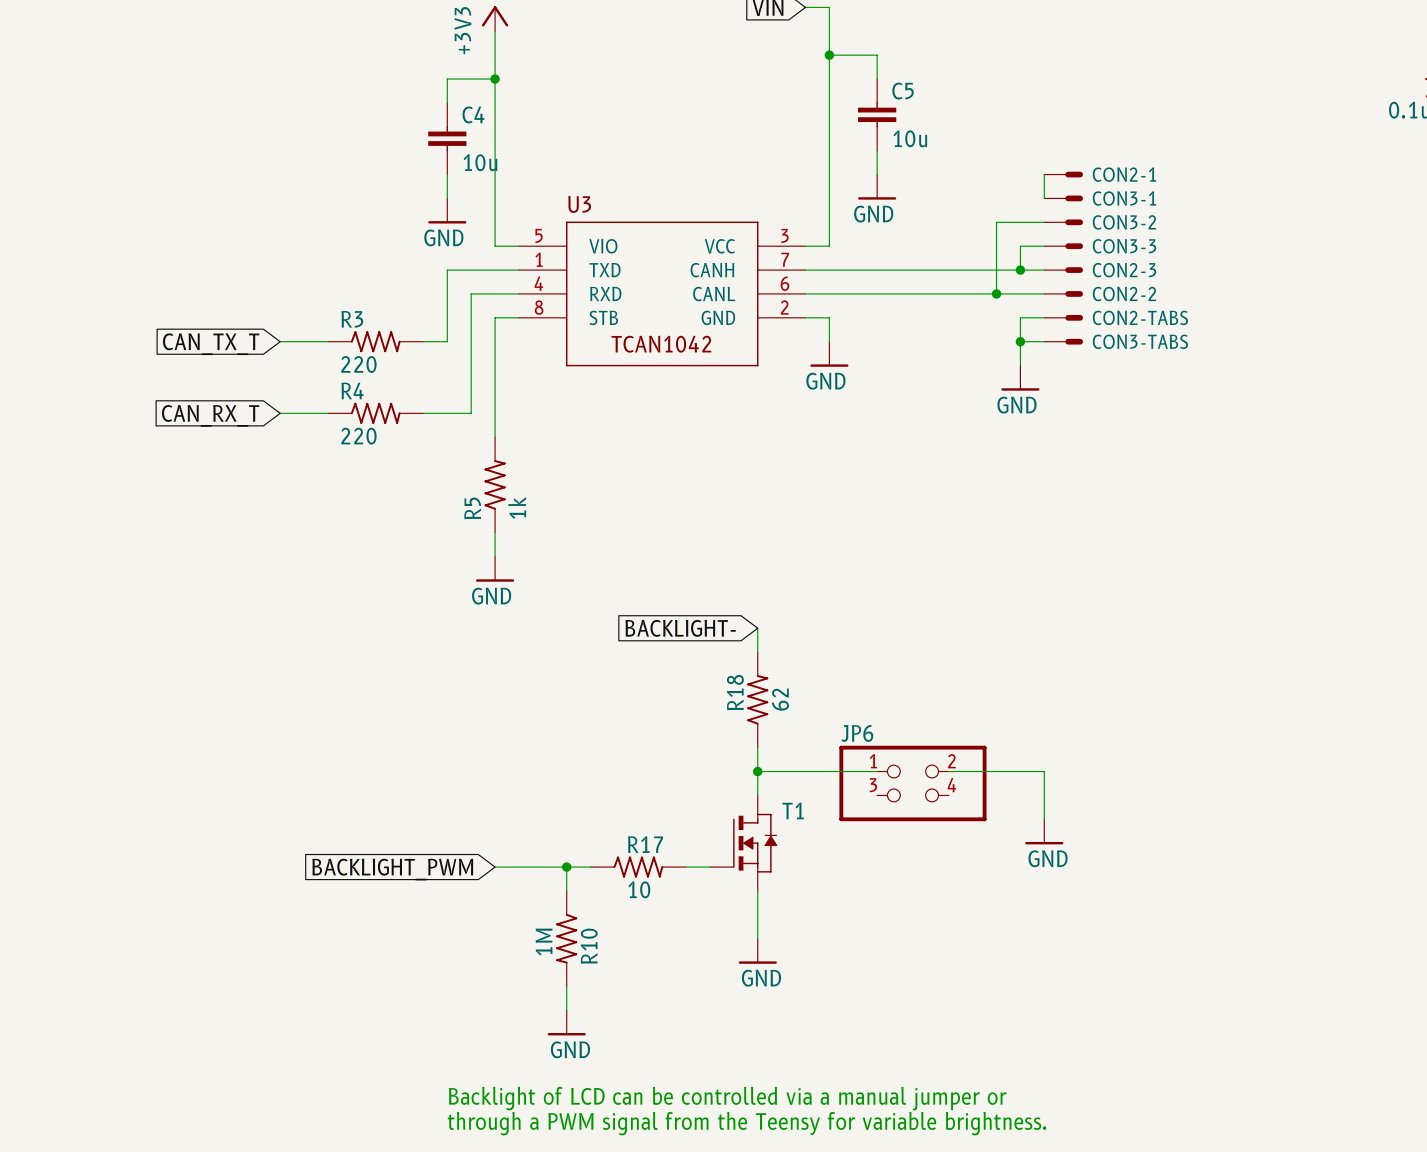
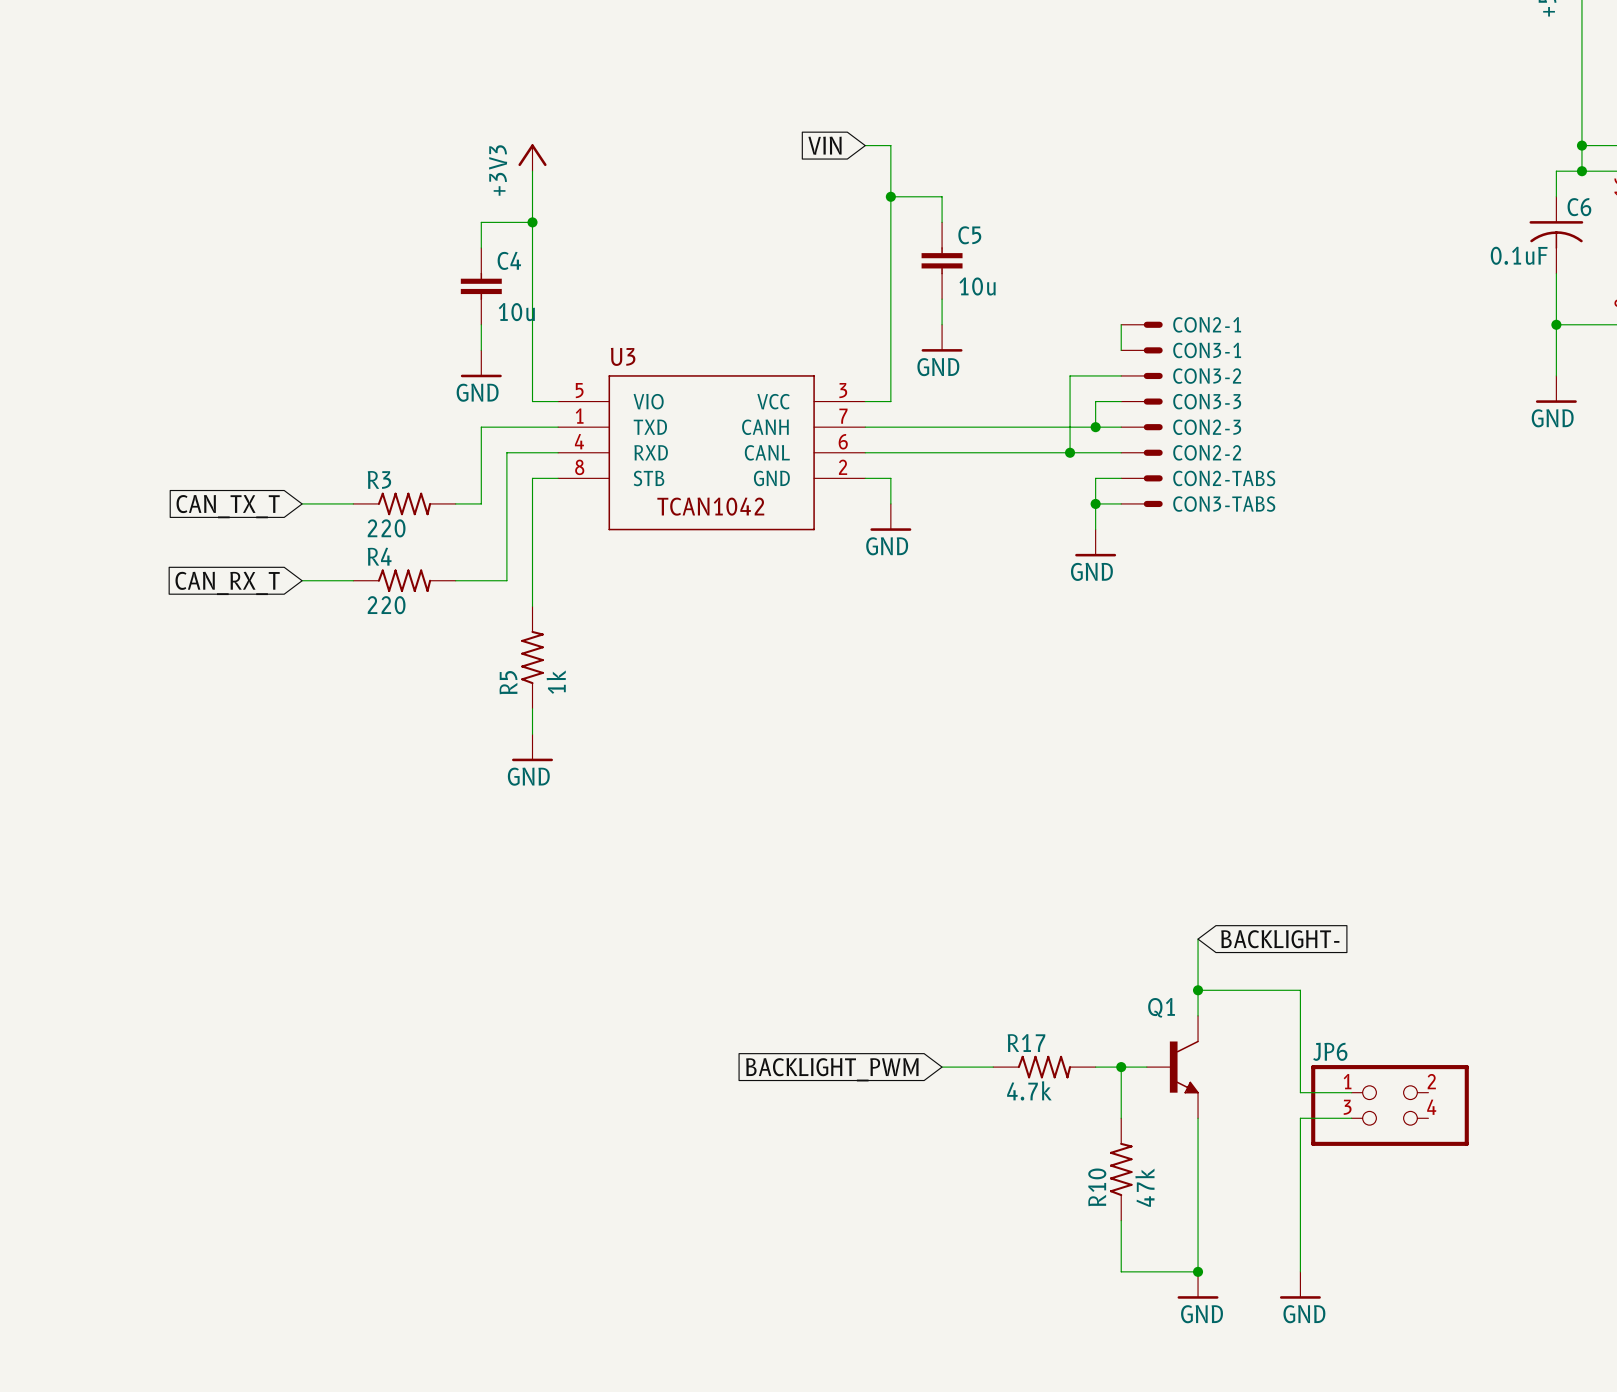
global label: BACKLIGHT- (680, 628) -> none
wire: (757, 628) (757, 652) -> none
R18: 62 (757, 699) -> none
wire: (757, 747) (757, 795) -> none
wire: none -> (1198, 939) (1198, 1015)
global label: none -> BACKLIGHT- (1280, 939)
wire: (757, 771) (877, 771) -> none
junction: (757, 771) -> none
wire: (948, 771) (1044, 771) (1044, 819) -> none
JP6 position: (912, 783) -> (1390, 1105)
wire: none -> (1198, 990) (1300, 990) (1300, 1092) (1351, 1092)
junction: none -> (1198, 990)
power symbol: GND (1044, 831) -> none
T1: (743, 843) -> none
R17 name position: R17 (645, 844) -> R17 (1026, 1043)
wire: (495, 867) (590, 867) -> none
wire: (566, 867) (566, 890) -> none
junction: (566, 867) -> none
R17 position: (638, 867) -> (1044, 1067)
wire: (686, 867) (709, 867) -> none
wire: none -> (942, 1067) (993, 1067)
wire: none -> (1095, 1067) (1146, 1067)
wire: none -> (1121, 1067) (1121, 1118)
junction: none -> (1121, 1067)
Q1: none -> (1172, 1067)
global label: BACKLIGHT_PWM (392, 869) -> none
global label: none -> BACKLIGHT_PWM (832, 1069)
R17 value: 10 (639, 889) -> 4.7k (1029, 1090)
wire: (757, 890) (757, 938) -> none
wire: none -> (1198, 1118) (1198, 1271) (1121, 1271) (1121, 1220)
wire: none -> (1351, 1118) (1300, 1118) (1300, 1271)
R10 rotation: 0° (566, 938) -> 180° (1121, 1169)
R10 position: (566, 938) -> (1121, 1169)
R10 value: 1M (544, 942) -> 47k (1144, 1187)
R10 name position: R10 (589, 946) -> R10 (1097, 1187)
power symbol: GND (757, 951) -> none
wire: (566, 986) (566, 1010) -> none
power symbol: GND (566, 1022) -> none
junction: none -> (1198, 1271)
power symbol: none -> GND (1198, 1285)
power symbol: none -> GND (1300, 1285)
text: Backlight of LCD can be controlled via a manual jumper or (727, 1098) -> none
text: through a PWM signal from the Teensy for variable brightness. (747, 1123) -> none

